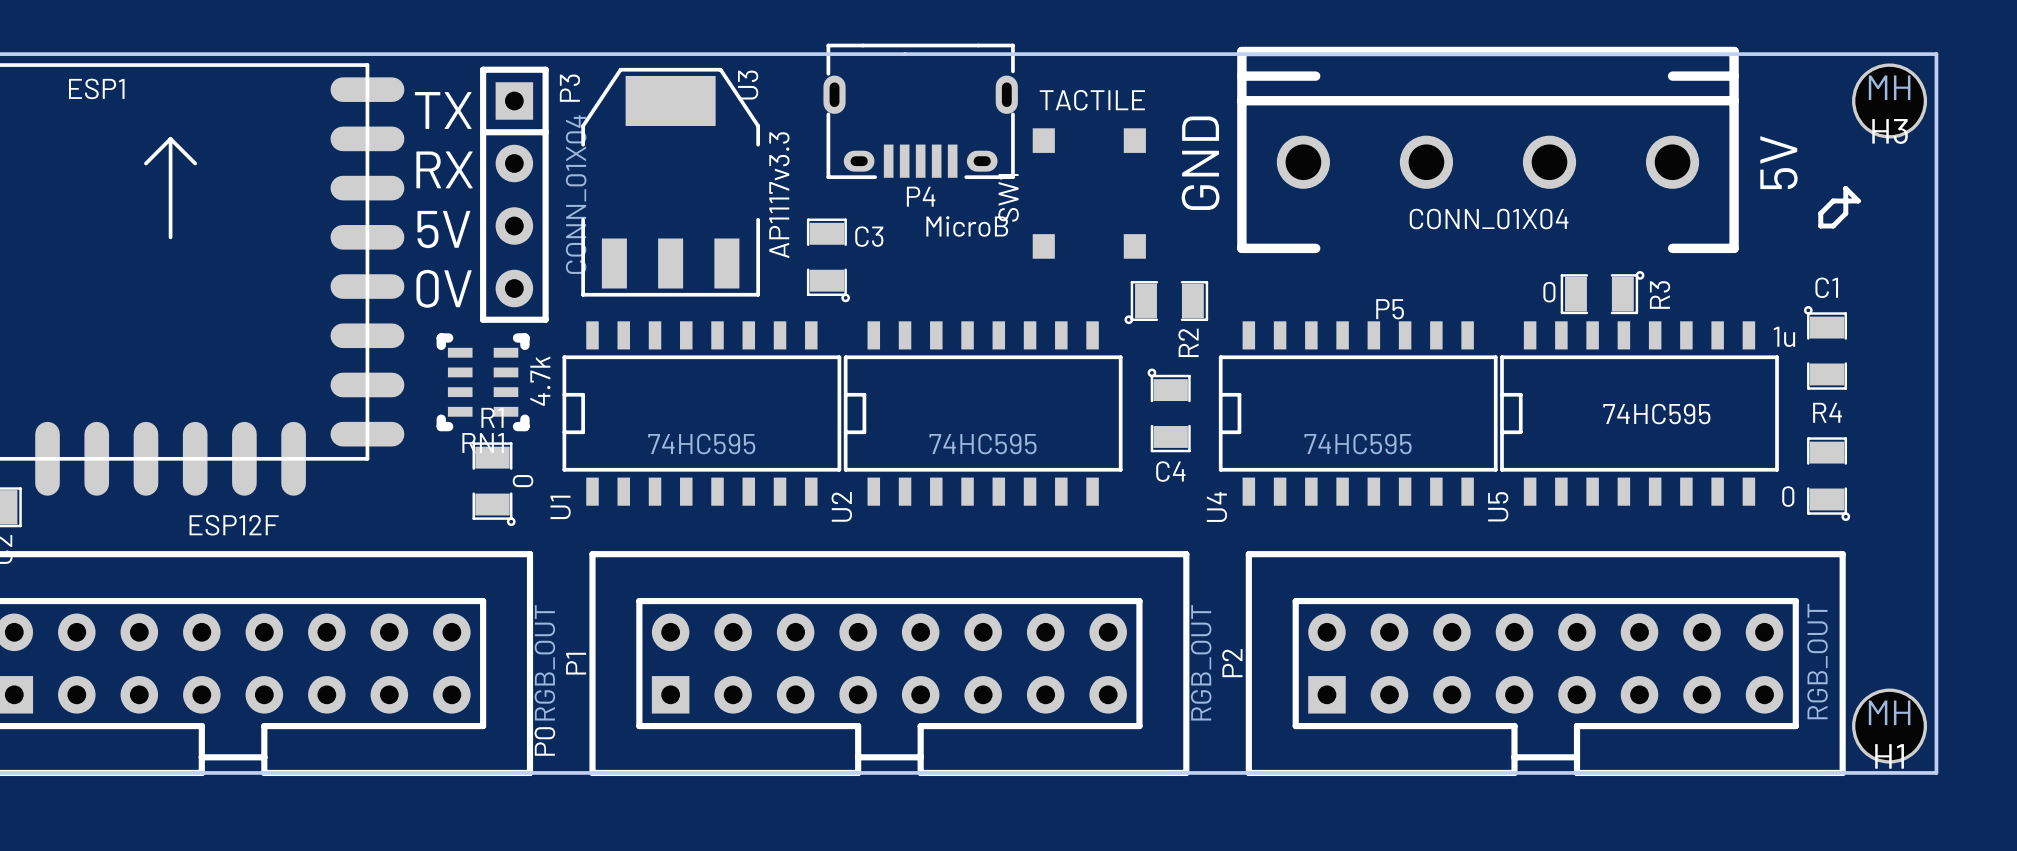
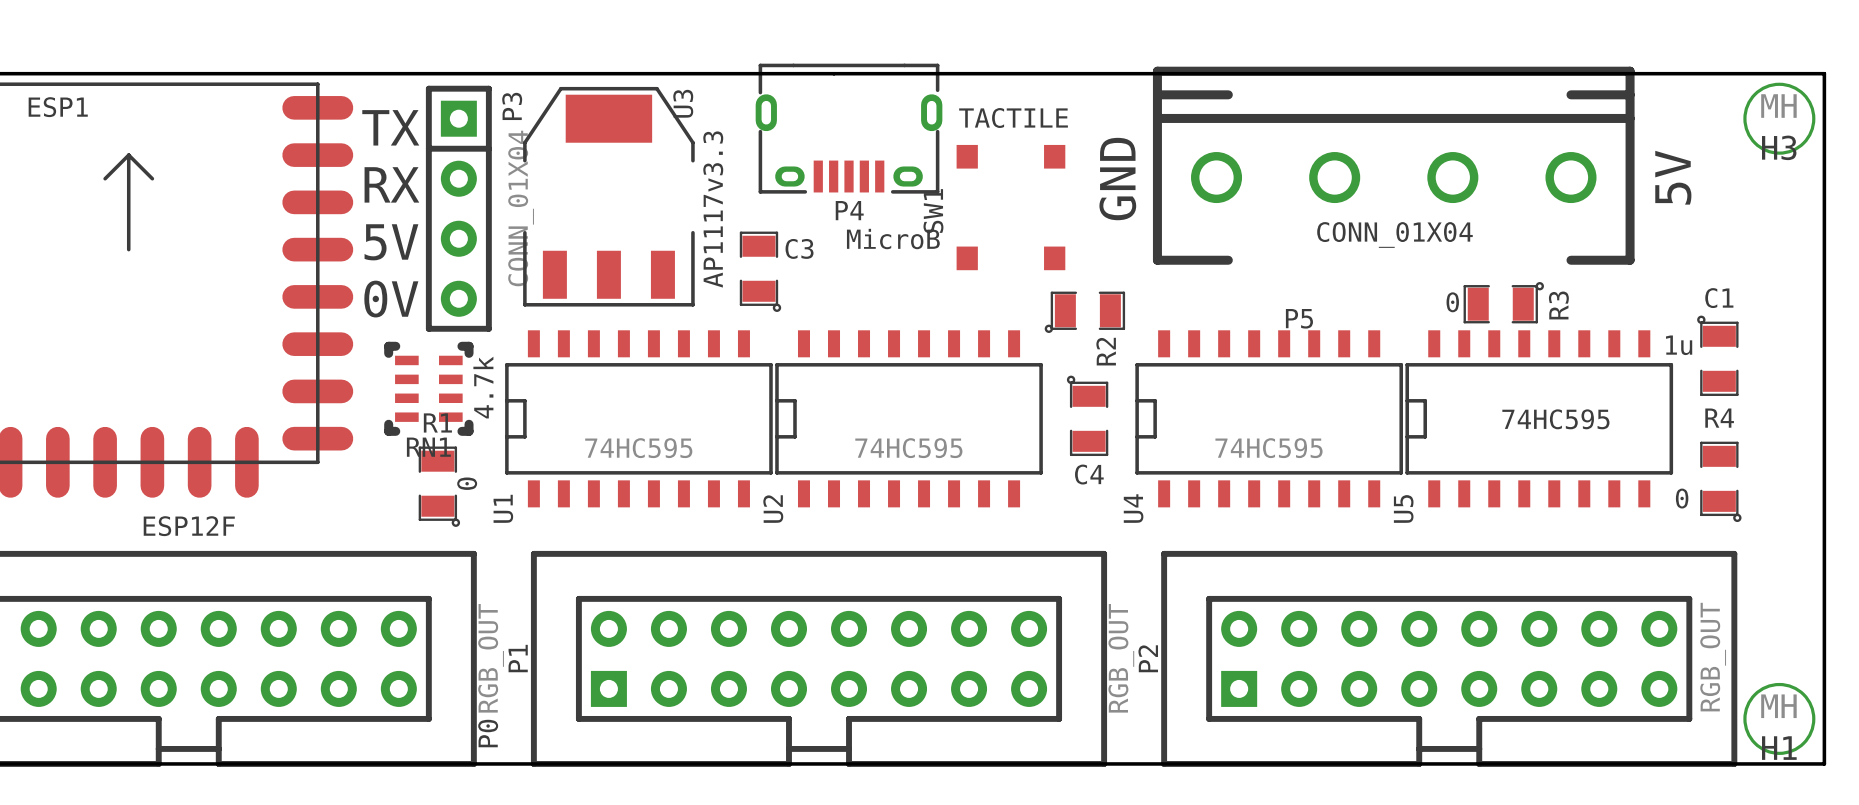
line: (1845, 188) (1845, 213) (1833, 226) (1820, 226) (1820, 213) (1833, 200) (1858, 200) (1845, 188) -> none

